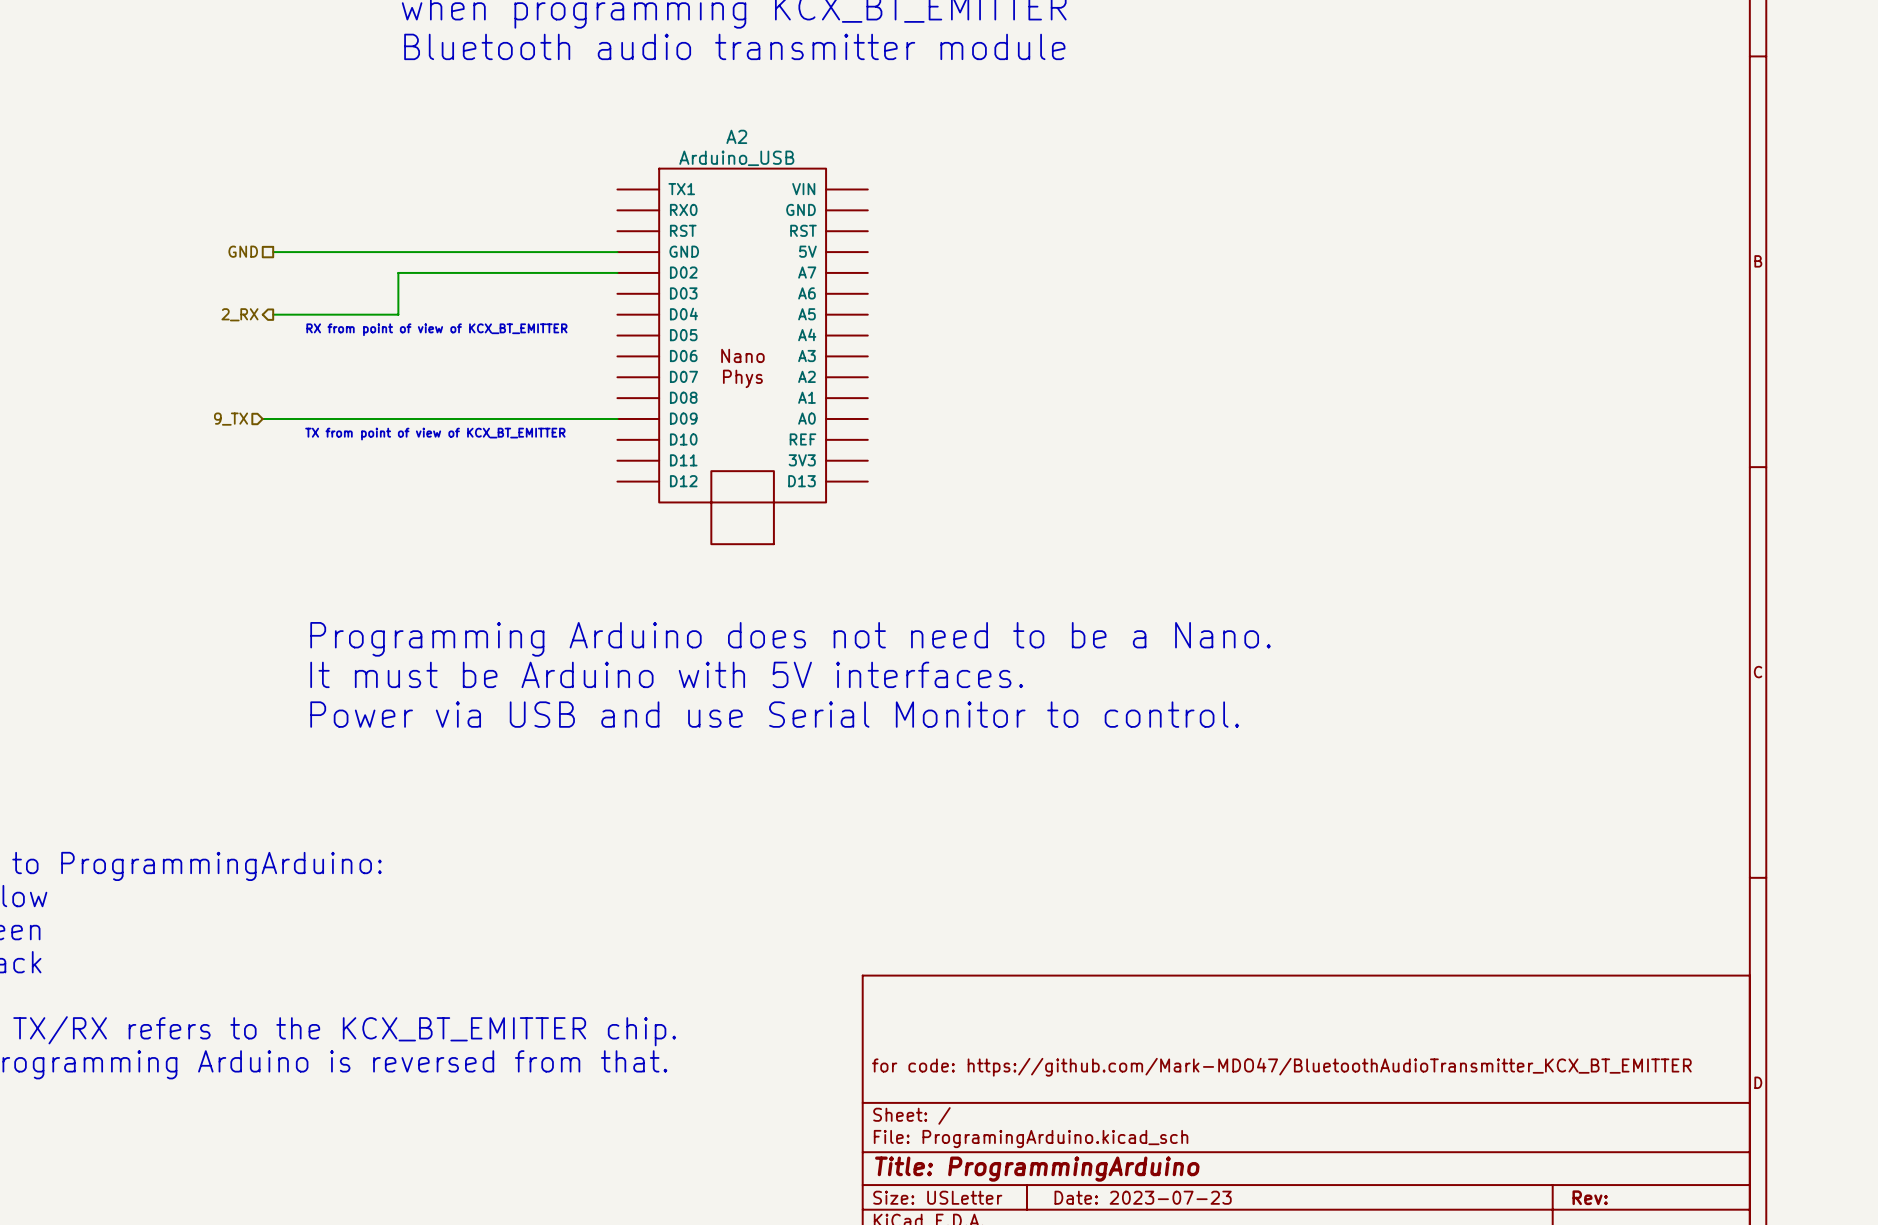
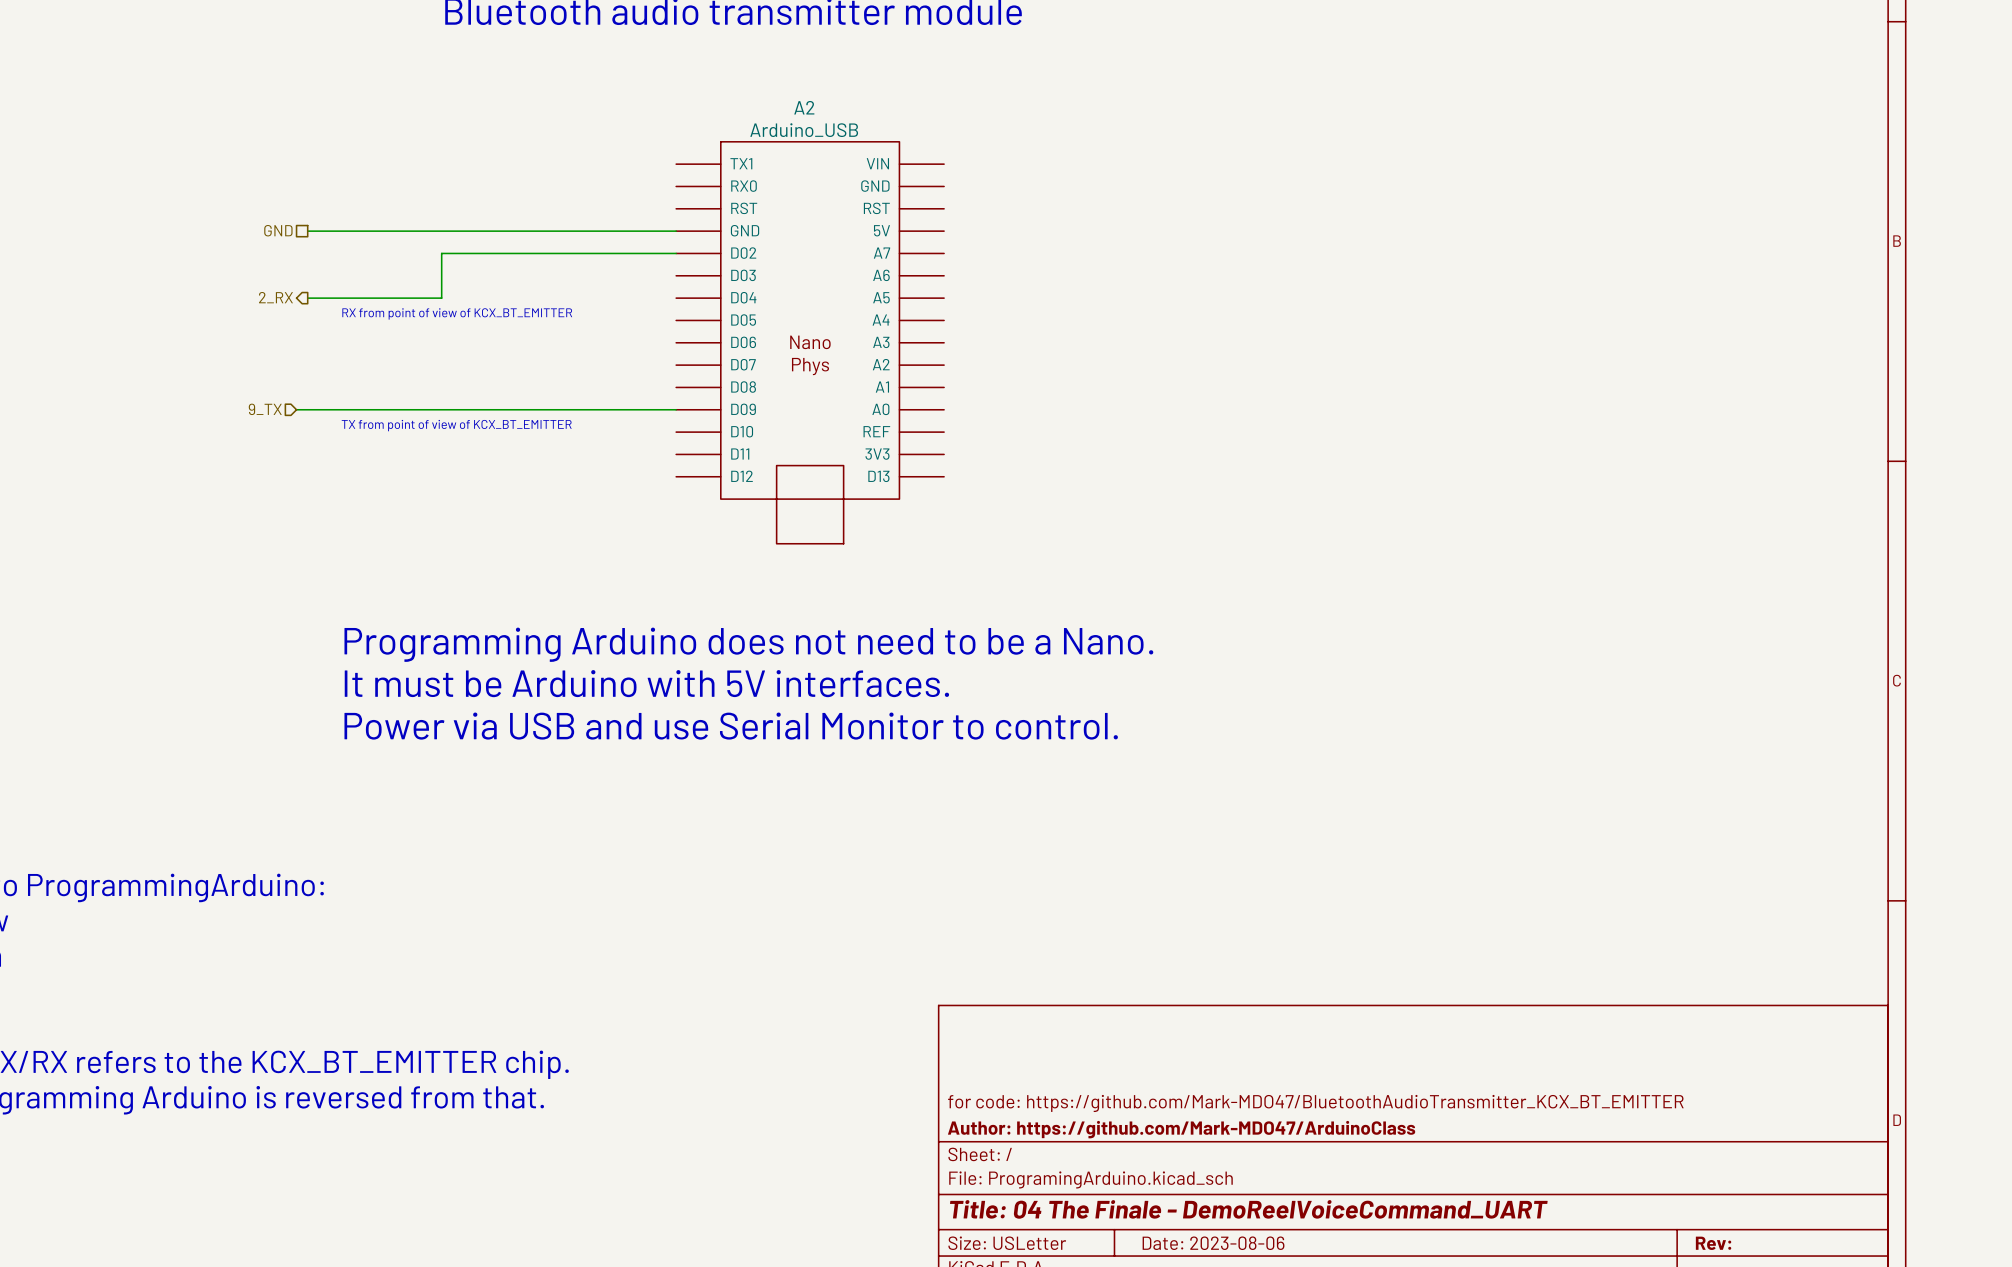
title block: none -> Author: https://github.com/Mark-MDO47/ArduinoClass (1181, 1129)
title block: Title: ProgrammingArduino (1037, 1169) -> Title: 04 The Finale - DemoReelVoiceCommand_UART (1248, 1209)
title block: Date: 2023-07-23 (1143, 1197) -> Date: 2023-08-06 (1213, 1243)

